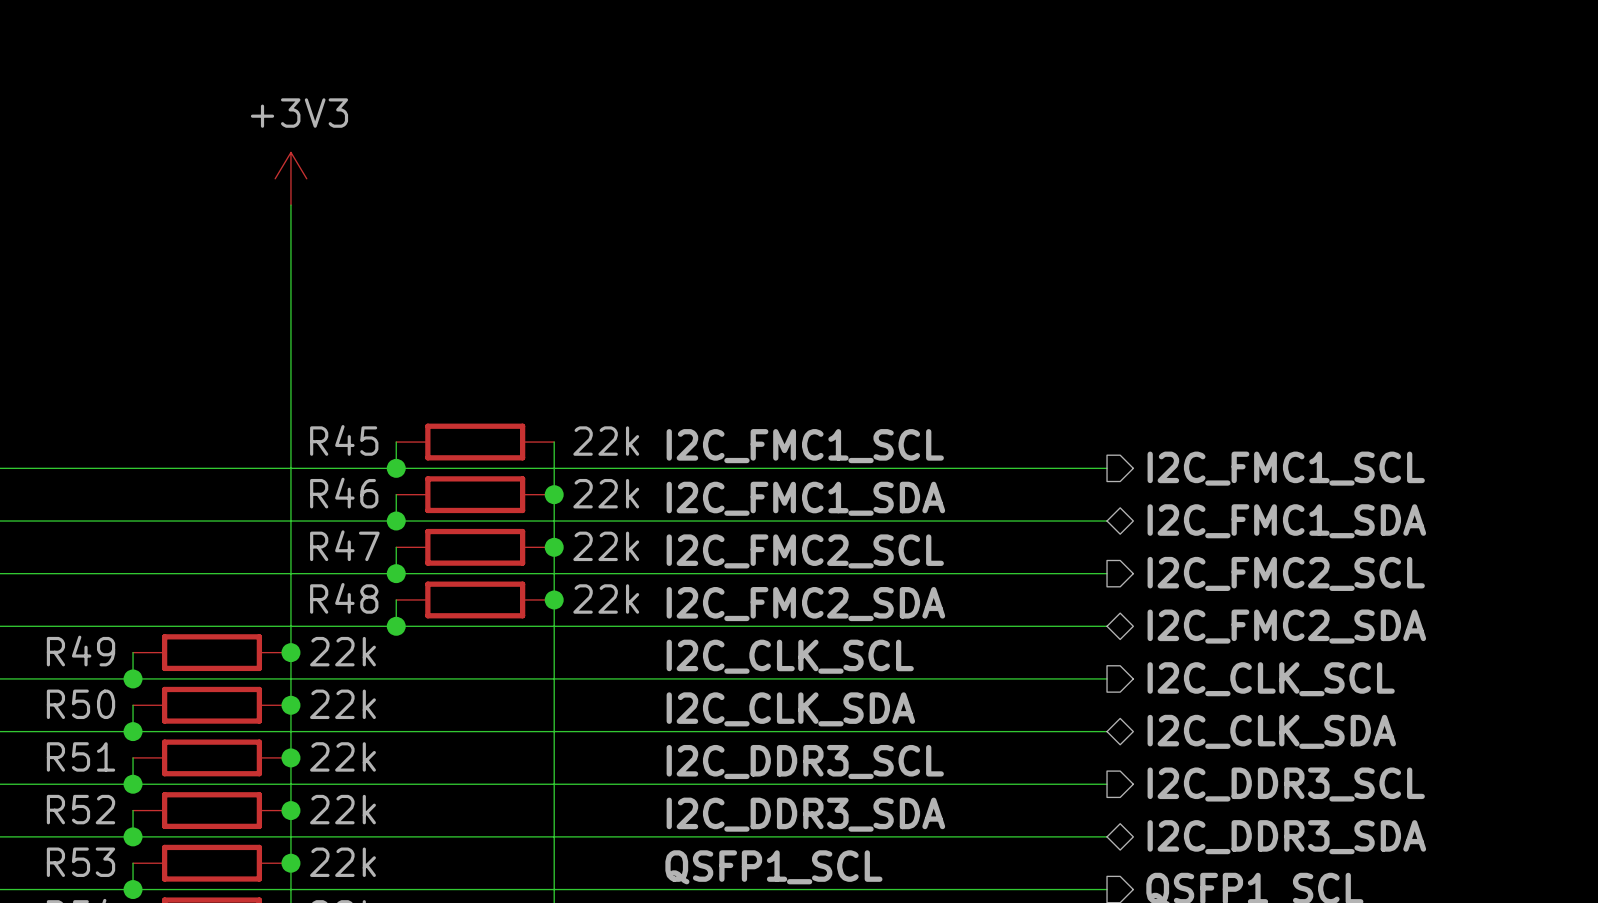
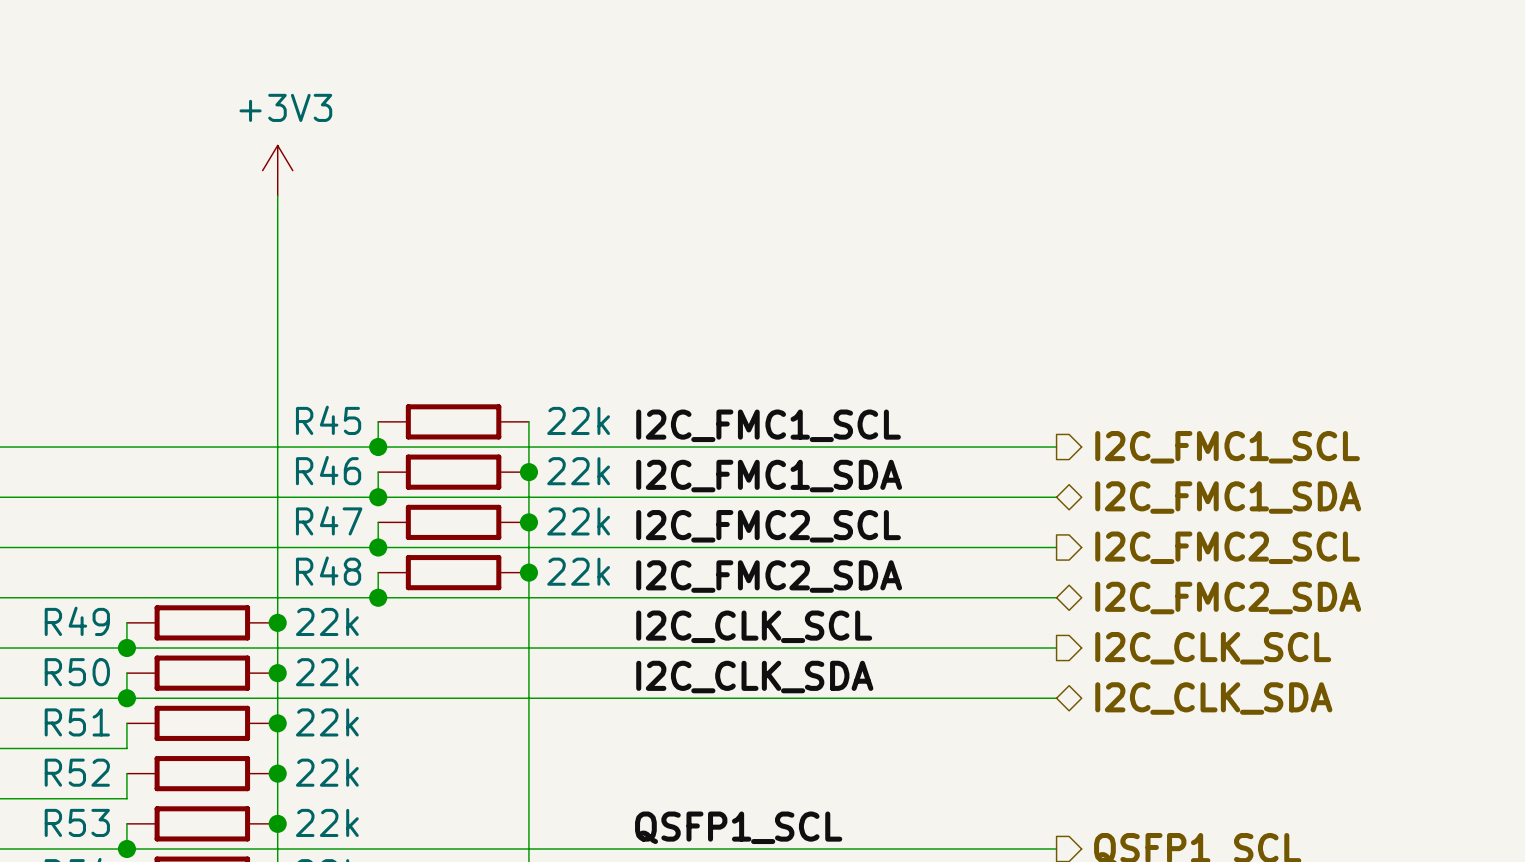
label: I2C_DDR3_SCL (805, 762) -> none
wire: (133, 784) (1107, 784) -> none
junction: (133, 784) -> none
hierarchical label: I2C_DDR3_SCL (1286, 784) -> none
label: I2C_DDR3_SDA (805, 814) -> none
wire: (133, 836) (1107, 836) -> none
junction: (133, 836) -> none
hierarchical label: I2C_DDR3_SDA (1286, 837) -> none

